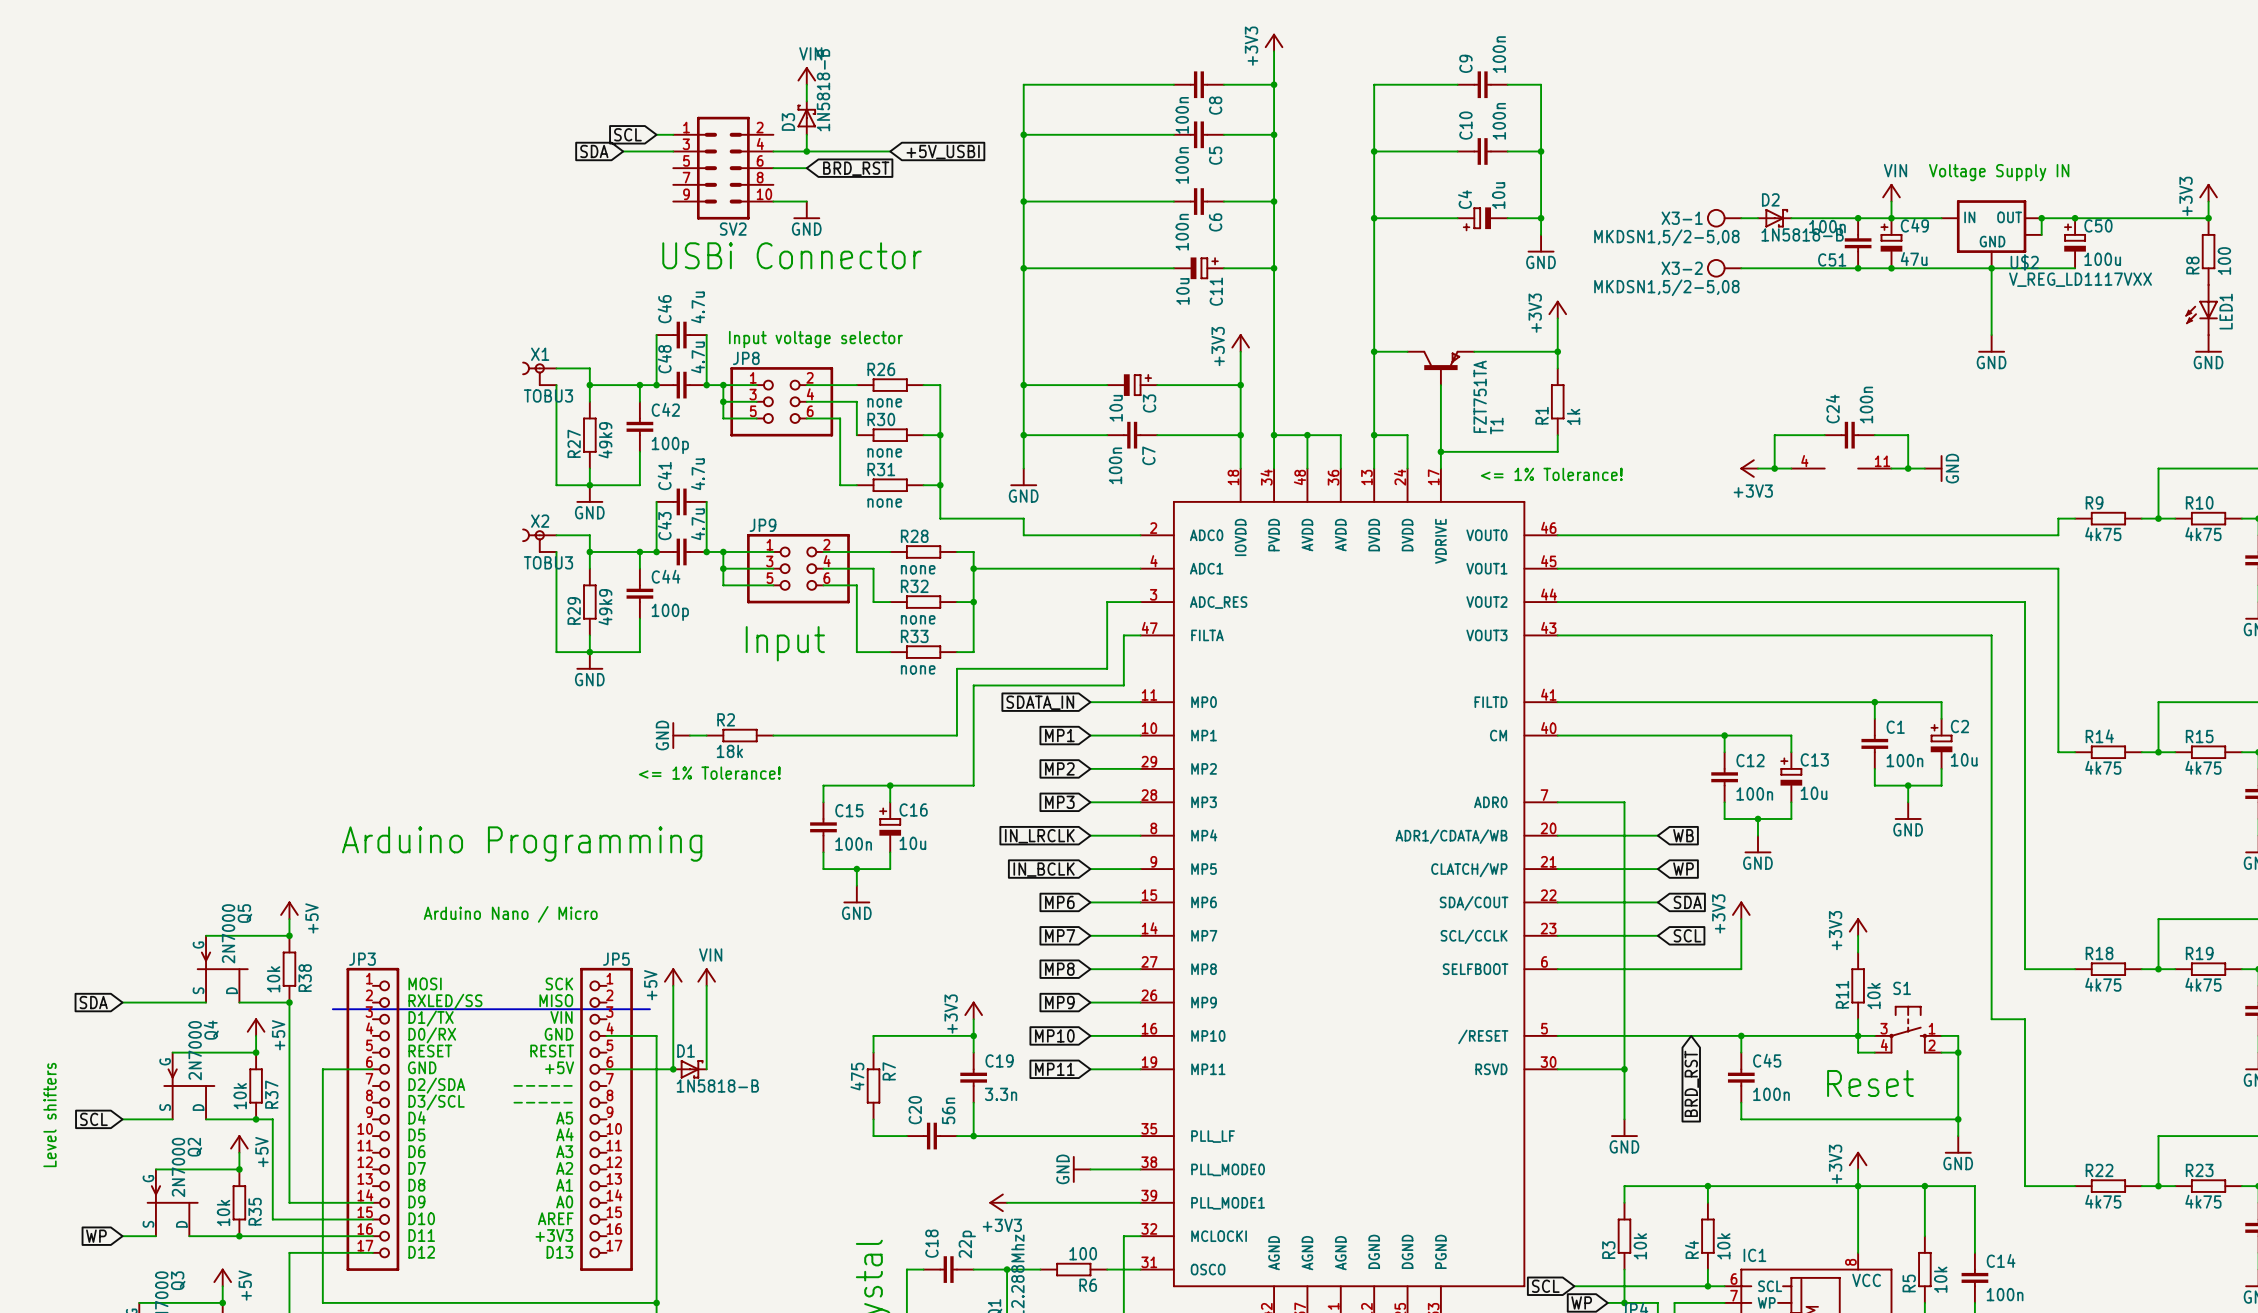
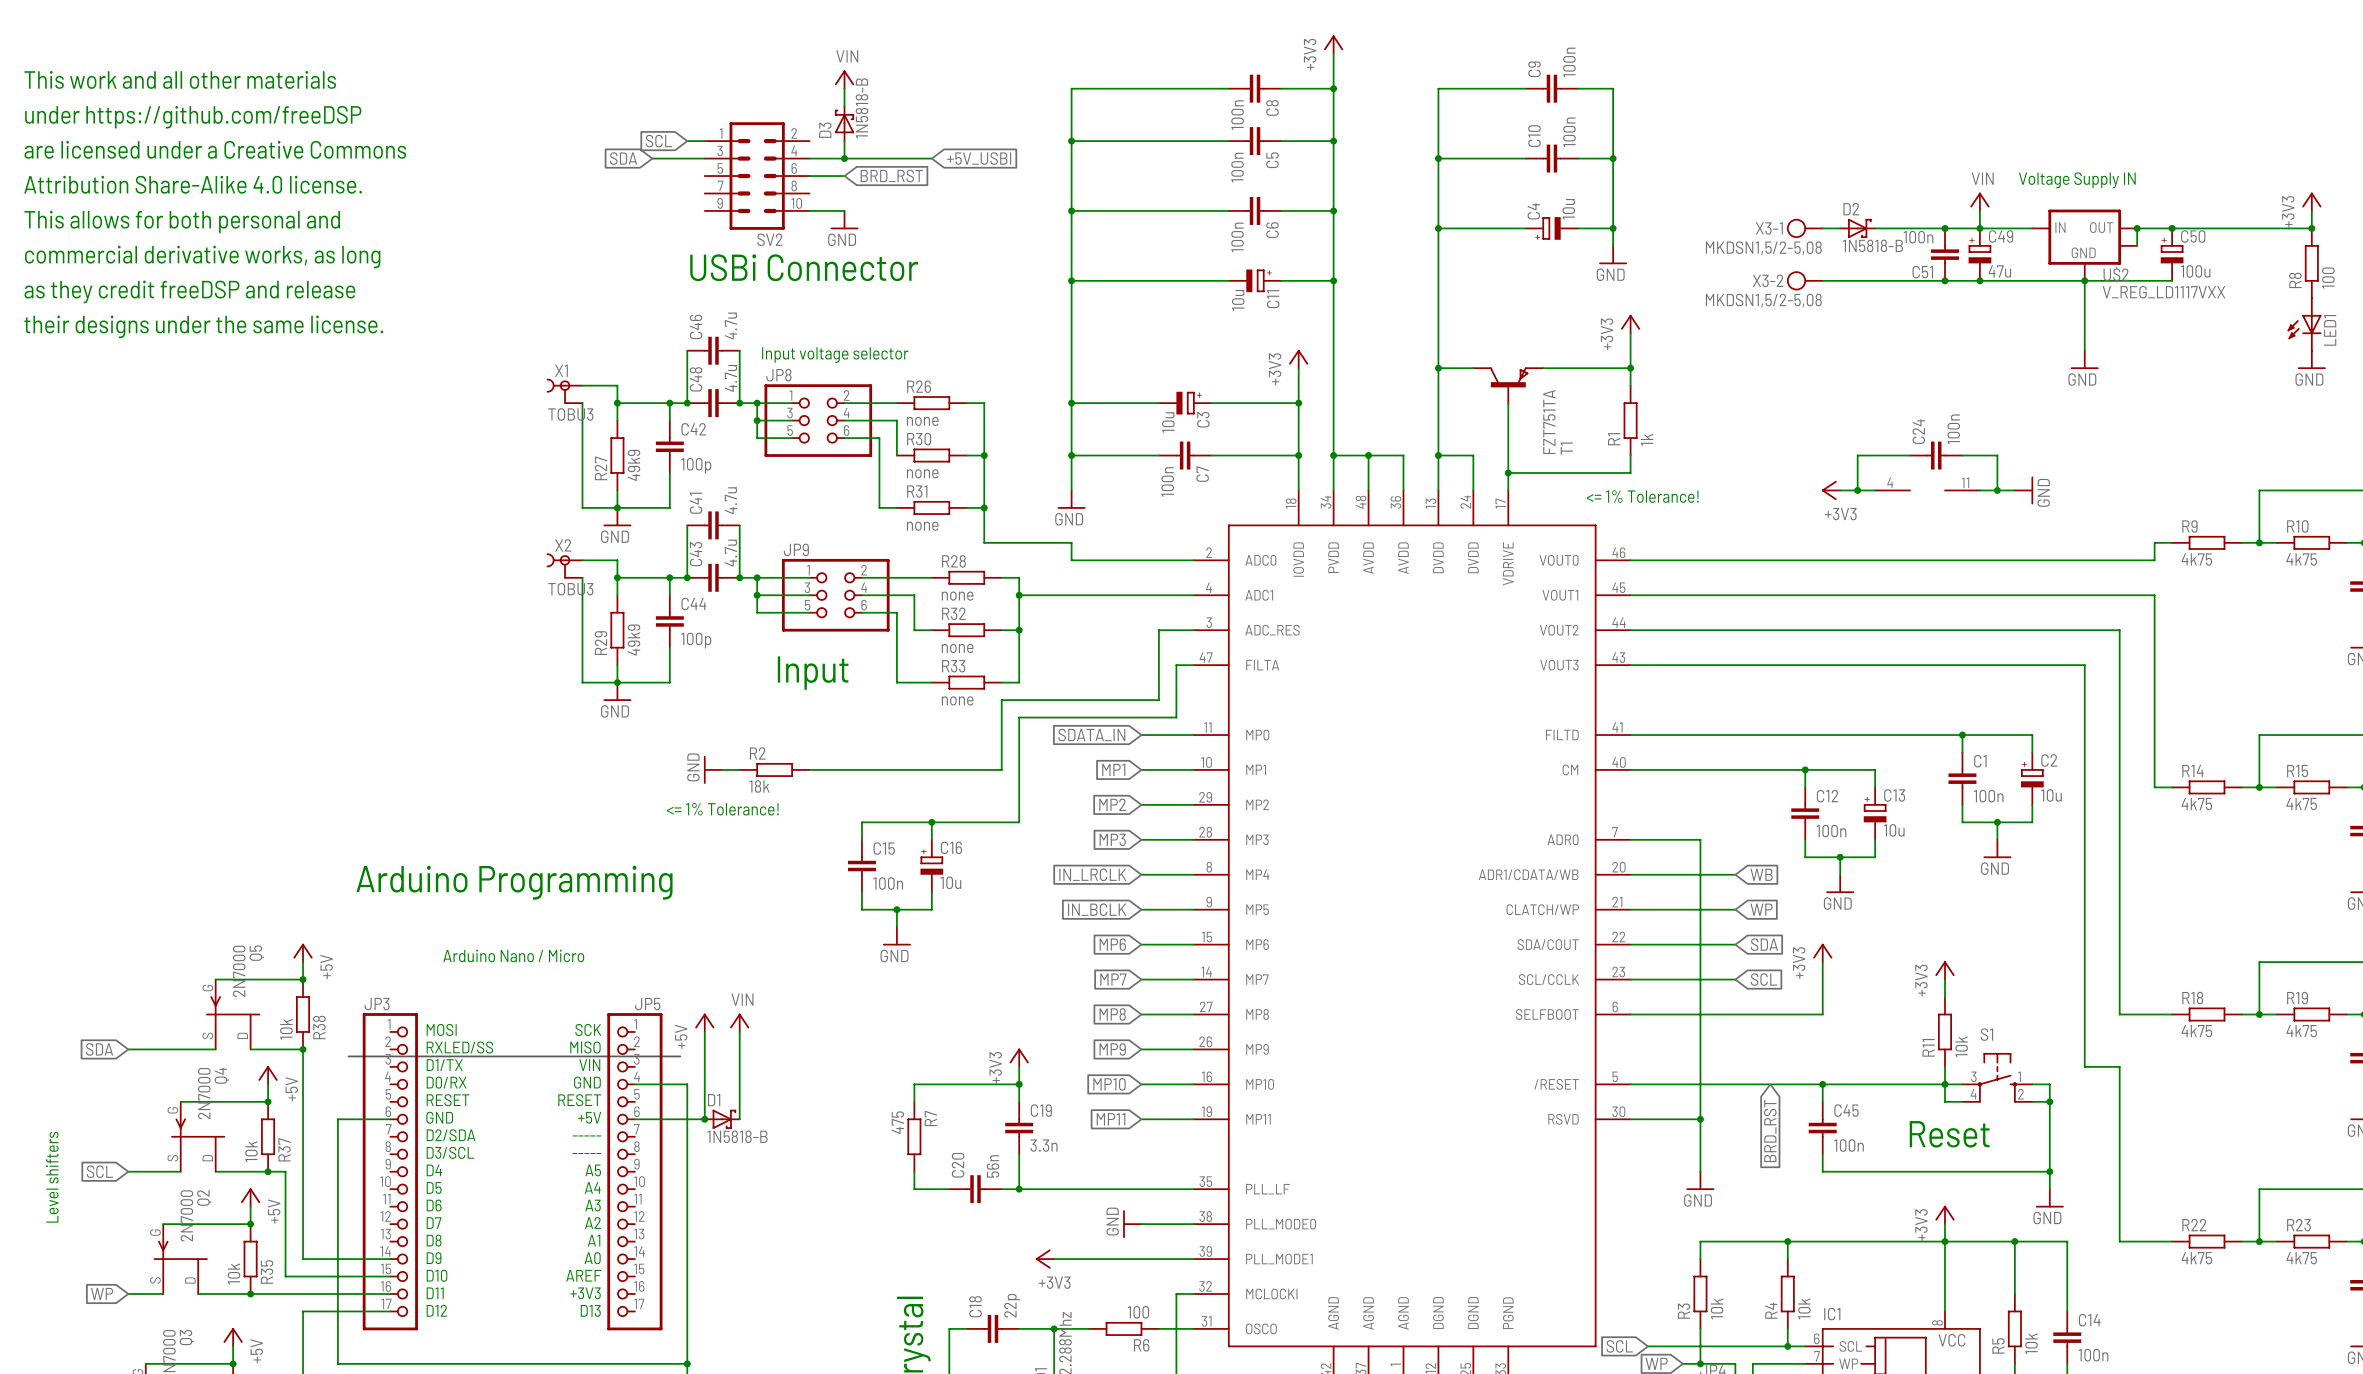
text: none -> This work and all other materials (180, 79)
text: none -> under https://github.com/freeDSP (193, 117)
text: none -> are licensed under a Creative Commons (215, 149)
text: none -> Attribution Share-Alike 4.0 license. (193, 184)
text: none -> This allows for both personal and (182, 222)
text: none -> commercial derivative works, as long (202, 256)
text: none -> as they credit freeDSP and release (189, 291)
text: none -> their designs under the same license. (203, 326)

